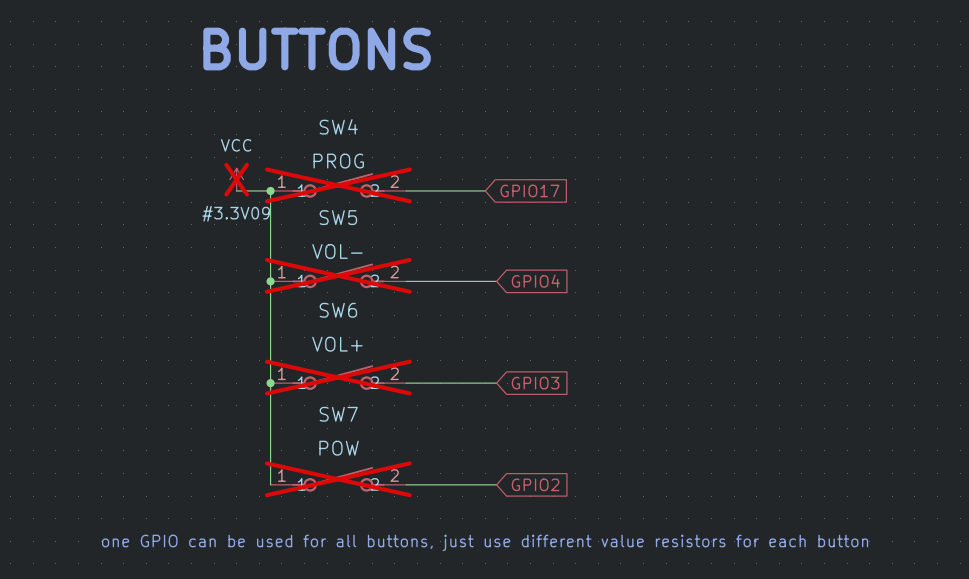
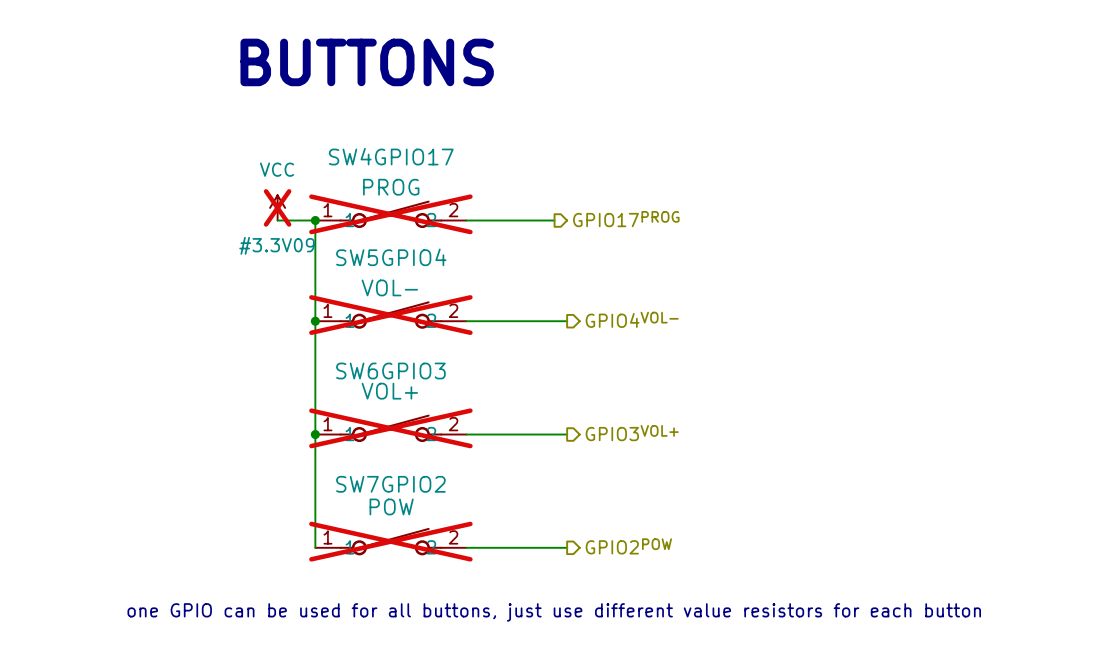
SW4 name: SW4 (338, 126) -> SW4GPIO17 (391, 156)
hierarchical label: none -> GPIO17PROG (626, 219)
global label: GPIO17 (529, 190) -> none
SW5 name: SW5 (338, 217) -> SW5GPIO4 (391, 257)
hierarchical label: none -> GPIO4VOL- (632, 319)
global label: GPIO4 (535, 281) -> none
SW6 name: SW6 (338, 310) -> SW6GPIO3 (390, 371)
hierarchical label: none -> GPIO3VOL+ (632, 433)
global label: GPIO3 (535, 383) -> none
SW7 name: SW7 (338, 414) -> SW7GPIO2 (390, 484)
hierarchical label: none -> GPIO2POW (628, 546)
global label: GPIO2 (535, 484) -> none

